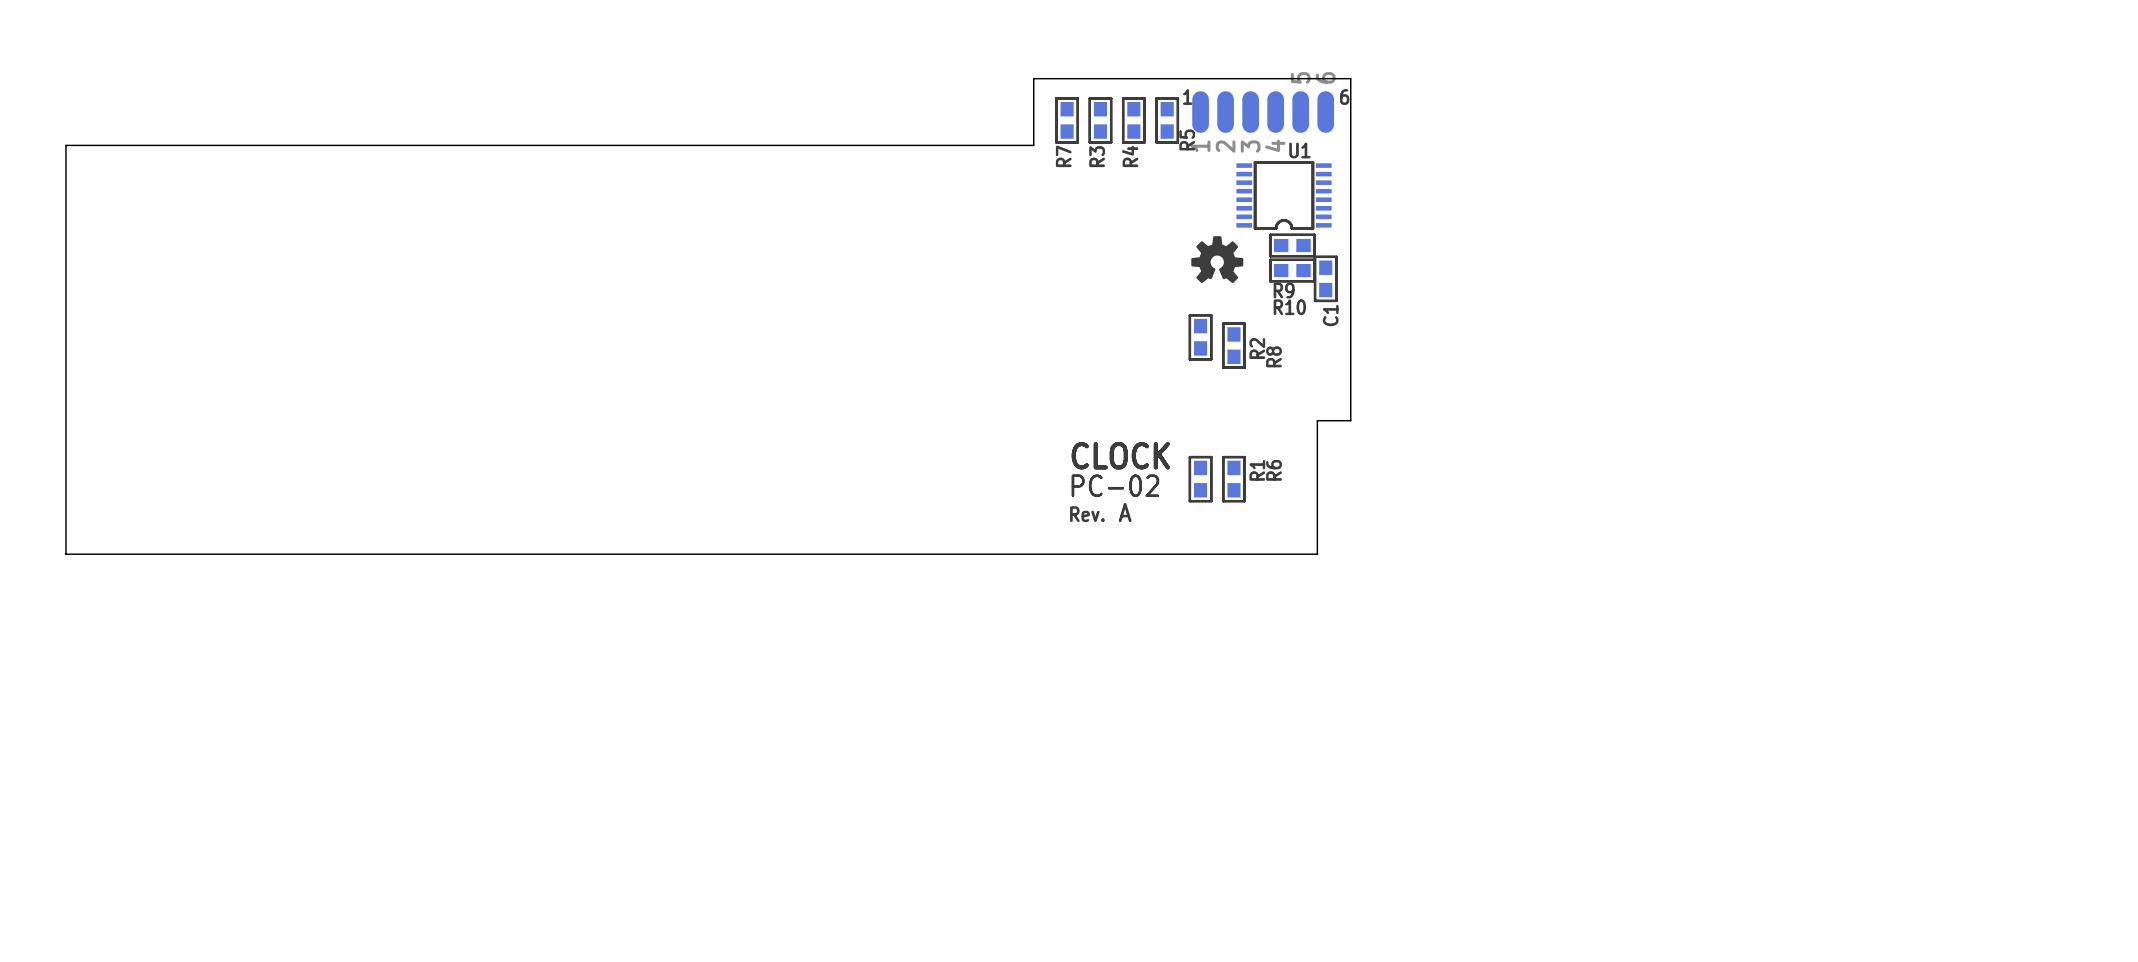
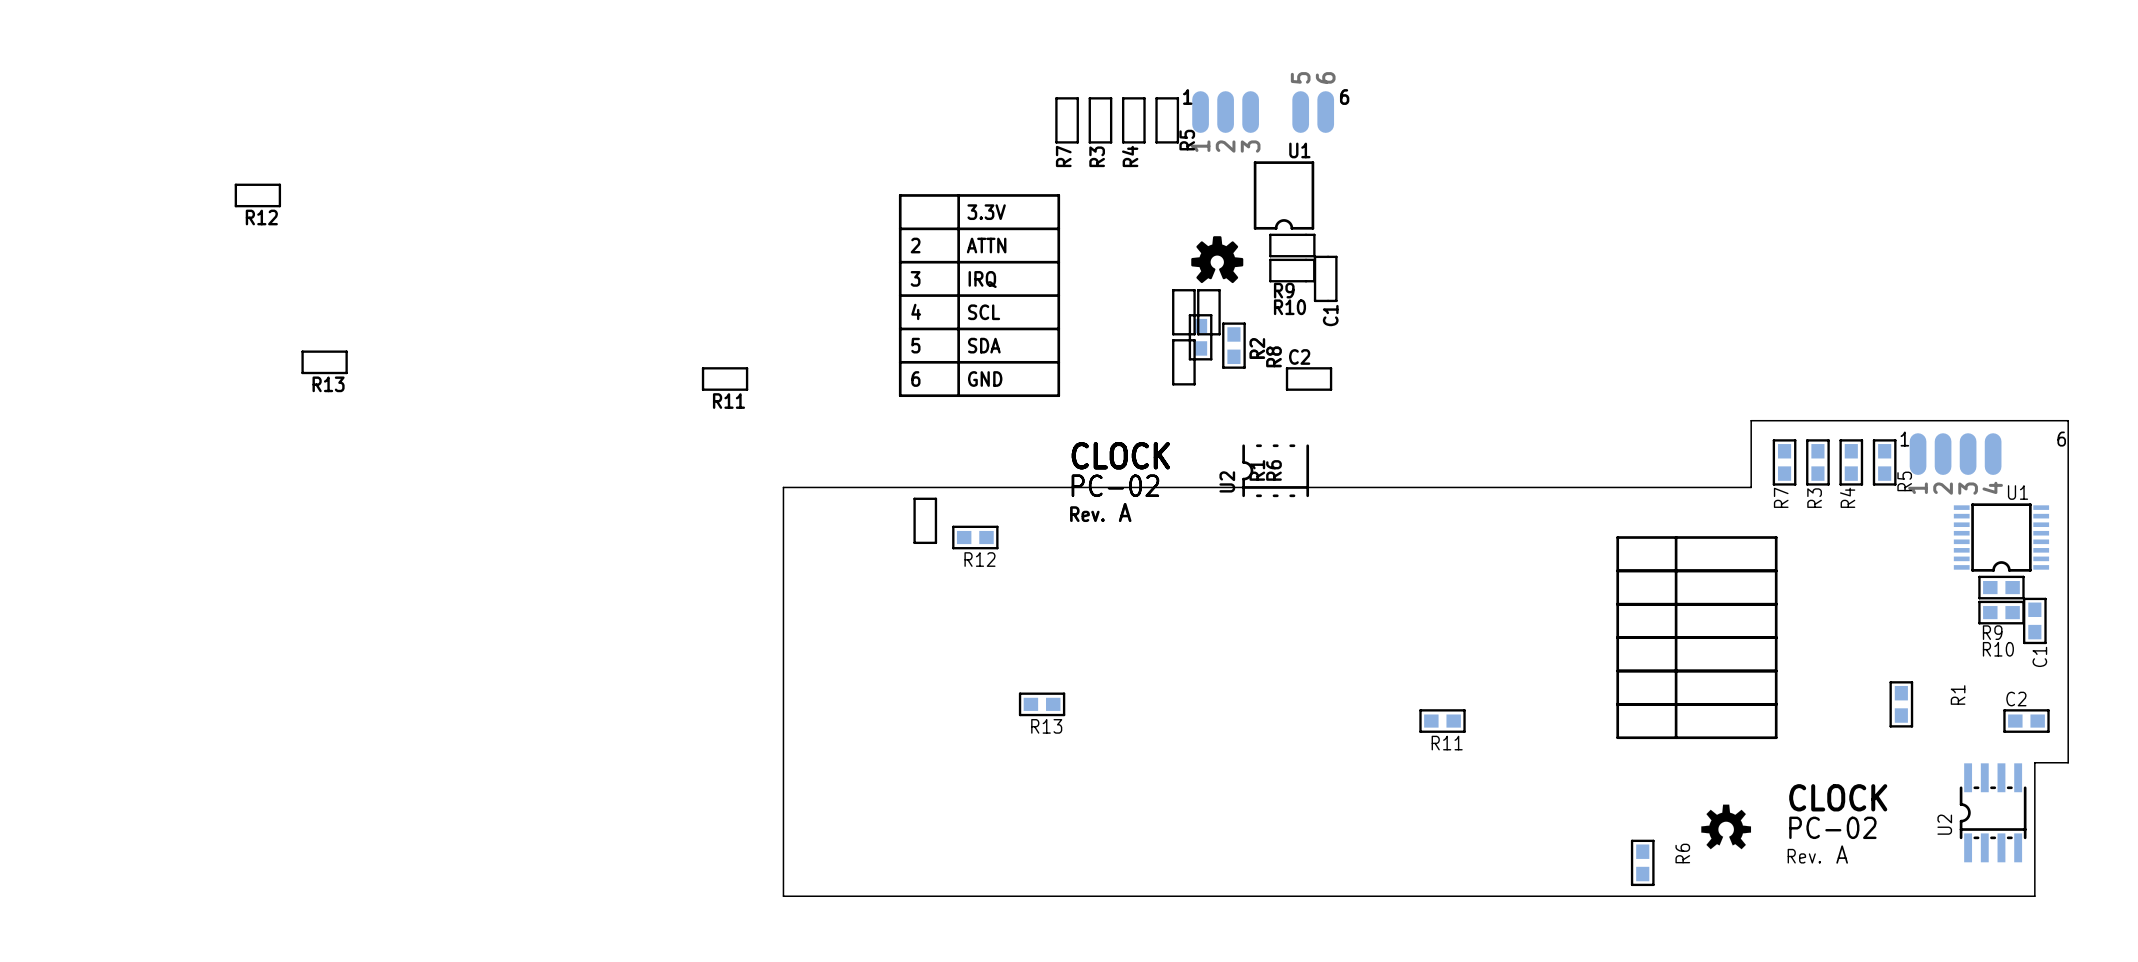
board edge: (1350, 78) (1350, 420) (1317, 420) (1317, 554) (65, 554) (65, 145) (1033, 145) (1033, 78) (1350, 78) -> none
part: 4 (1275, 112) -> none
R7 position: (1067, 120) -> (1784, 462)
R3 position: (1100, 120) -> (1817, 462)
R4 position: (1133, 120) -> (1851, 462)
R5 position: (1167, 120) -> (1884, 462)
line: none -> (279, 184) (235, 184) (235, 206) (279, 206) (279, 184)
line: none -> (958, 195) (958, 395)
line: none -> (1058, 195) (900, 195) (900, 395) (1058, 395) (1058, 195)
U1 position: (1284, 195) -> (2001, 537)
text: none -> 3.3V (986, 212)
text: none -> R12 (261, 217)
line: none -> (1058, 228) (900, 228)
text: none -> 2 (915, 245)
text: none -> ATTN (986, 245)
R9 position: (1292, 245) -> (2001, 587)
line: none -> (1058, 262) (900, 262)
R10 position: (1292, 270) -> (2001, 612)
text: none -> 3 (915, 278)
C1 position: (1325, 278) -> (2034, 620)
text: none -> IRQ (982, 279)
line: none -> (1058, 295) (900, 295)
text: none -> 4 (916, 311)
text: none -> SCL (984, 312)
line: (1211, 315) (1211, 359) (1189, 359) (1189, 315) (1211, 315) -> (1219, 290) (1219, 334) (1198, 334) (1198, 290) (1219, 290)
line: (1244, 323) (1244, 367) (1223, 367) (1223, 323) (1244, 323) -> (1194, 340) (1194, 384) (1173, 384) (1173, 340) (1194, 340)
line: none -> (1058, 328) (900, 328)
text: none -> 5 (915, 345)
text: none -> SDA (984, 345)
line: none -> (346, 351) (302, 351) (302, 372) (346, 372) (346, 351)
text: none -> C2 (1299, 356)
line: none -> (1058, 362) (900, 362)
line: none -> (747, 368) (703, 368) (703, 389) (747, 389) (747, 368)
line: none -> (1331, 368) (1287, 368) (1287, 389) (1331, 389) (1331, 368)
text: none -> 6 (915, 379)
text: none -> GND (985, 379)
text: none -> R13 (328, 384)
text: none -> R11 (729, 401)
board edge: none -> (2068, 420) (2068, 762) (2034, 762) (2034, 896) (783, 896) (783, 487) (1751, 487) (1751, 420) (2068, 420)
text: none -> 1 (1904, 439)
text: none -> 6 (2061, 439)
line: none -> (1243, 445) (1243, 462) (1249, 464) (1251, 470) (1249, 476) (1243, 479) (1243, 495)
line: none -> (1260, 445) (1257, 445)
line: none -> (1277, 445) (1273, 445)
line: none -> (1294, 445) (1290, 445)
line: none -> (1307, 445) (1307, 495)
part: none -> 1 (1918, 454)
part: none -> 2 (1943, 454)
part: none -> 3 (1968, 454)
part: none -> 4 (1993, 454)
line: (1211, 457) (1211, 501) (1189, 501) (1189, 457) (1211, 457) -> (1194, 290) (1194, 334) (1173, 334) (1173, 290) (1194, 290)
line: (1244, 457) (1223, 457) (1223, 501) (1244, 501) (1244, 457) -> (935, 498) (914, 498) (914, 542) (935, 542) (935, 498)
R1 position: (1200, 479) -> (1901, 704)
R6 position: (1233, 479) -> (1642, 862)
text: none -> U2 (1227, 481)
line: none -> (1307, 487) (1243, 487)
line: none -> (1260, 495) (1257, 495)
line: none -> (1277, 495) (1273, 495)
line: none -> (1294, 495) (1290, 495)
drawing: none -> [1616, 536, 1778, 740]
R12: none -> (975, 537)
R13: none -> (1042, 704)
R11: none -> (1442, 721)
C2: none -> (2026, 721)
drawing: none -> [1787, 784, 1888, 864]
drawing: none -> [1701, 804, 1752, 850]
U2: none -> (1993, 812)

